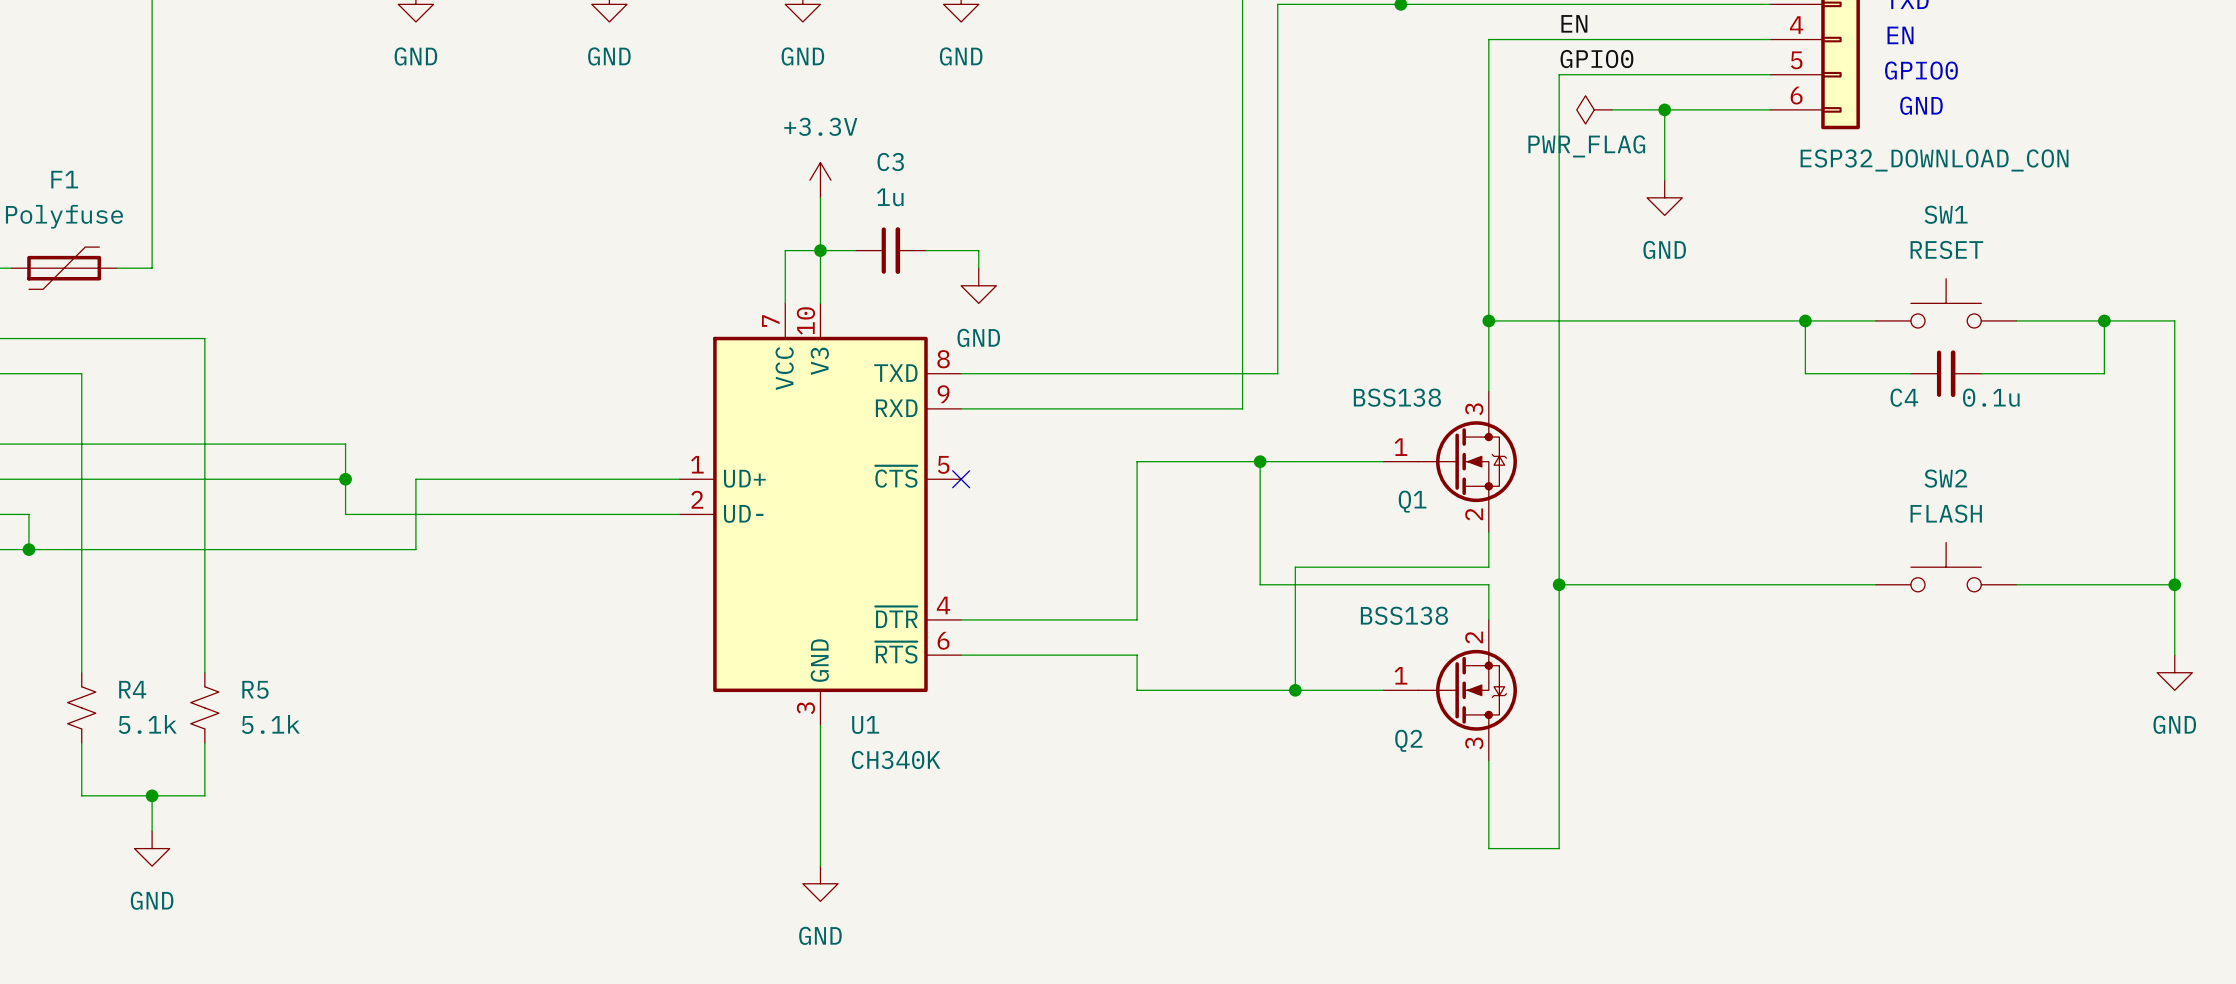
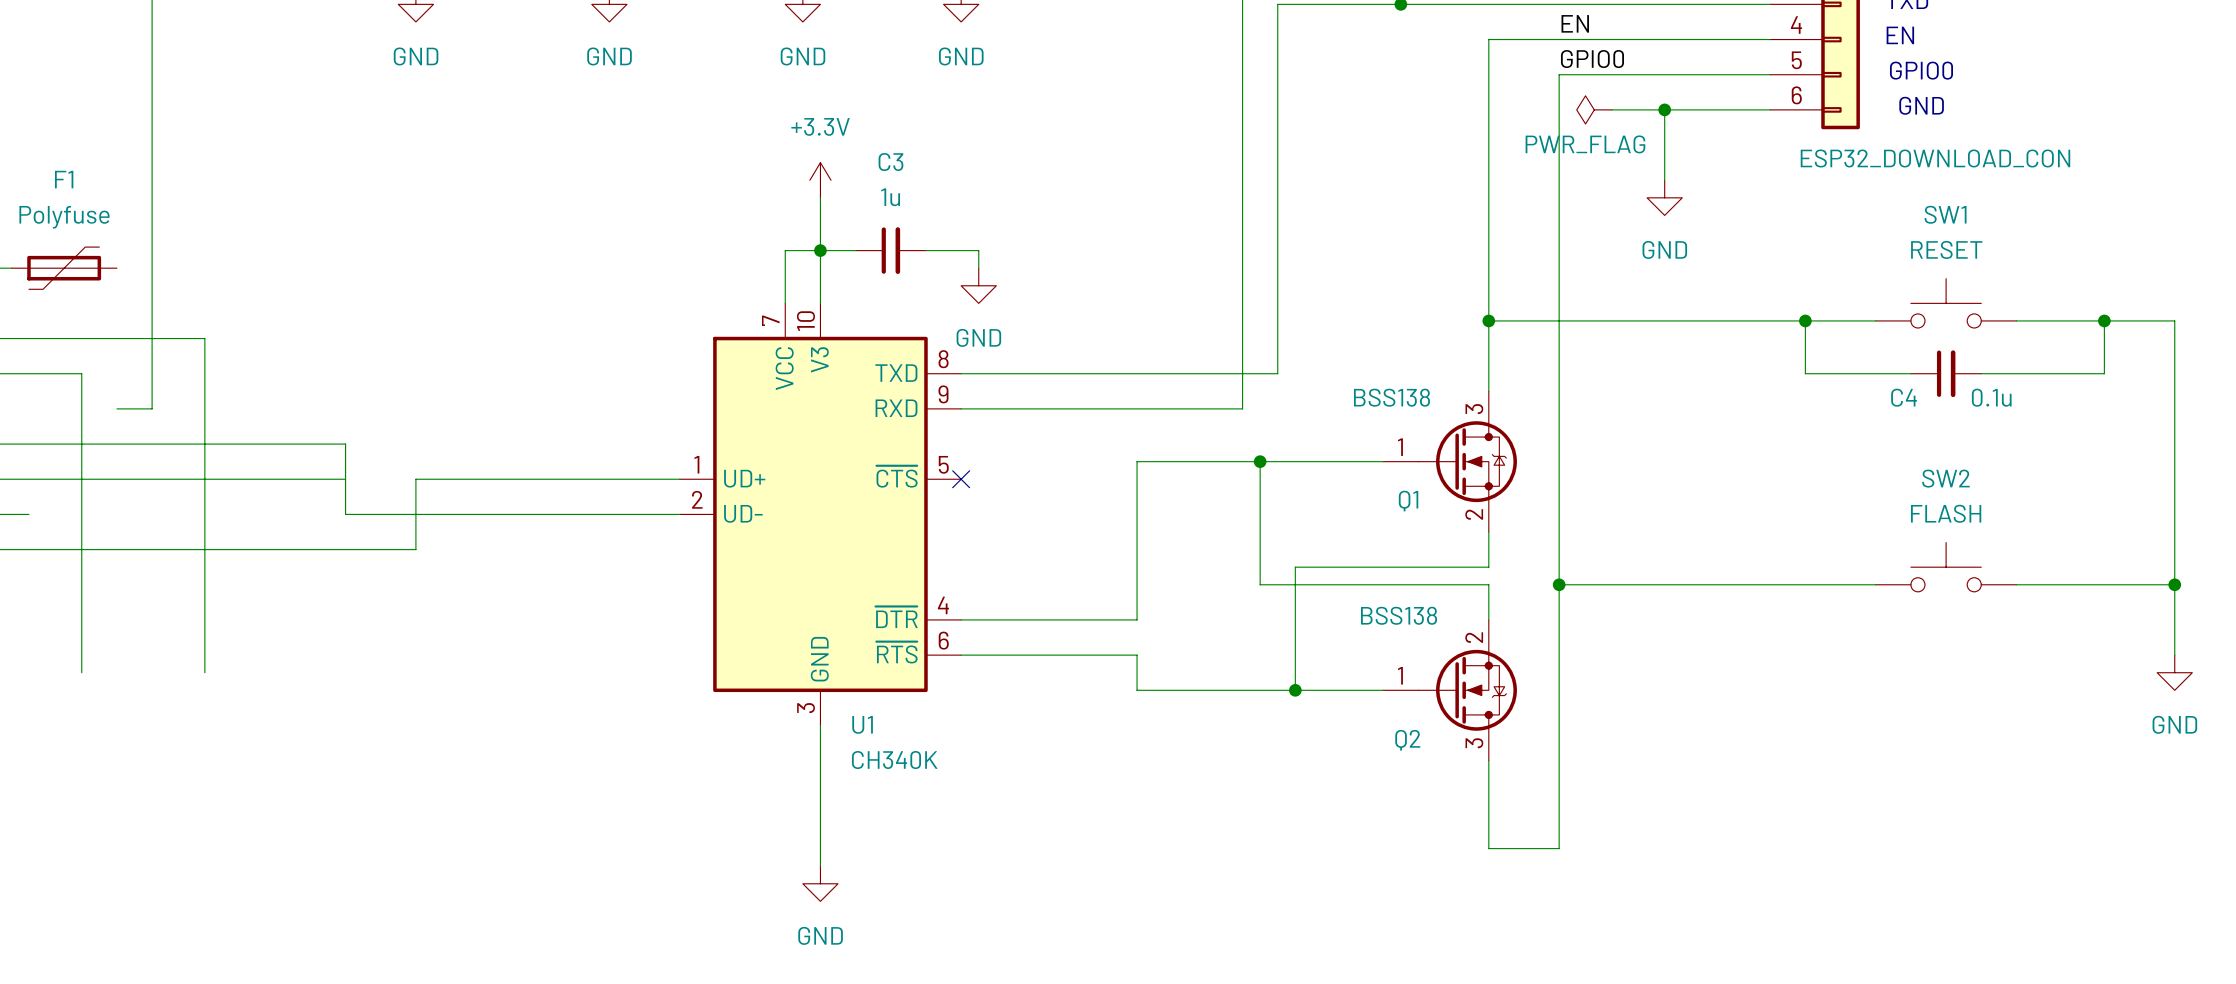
wire: (116, 268) (152, 268) -> (116, 408) (152, 408) (152, 268)
junction: (345, 479) -> none
wire: (28, 514) (28, 549) -> none
junction: (28, 549) -> none
R4: 5.1k (81, 707) -> none
R5: 5.1k (204, 707) -> none
wire: (81, 743) (81, 795) (204, 795) (204, 743) -> none
wire: (152, 795) (152, 831) -> none
junction: (152, 795) -> none
power symbol: GND (152, 848) -> none

